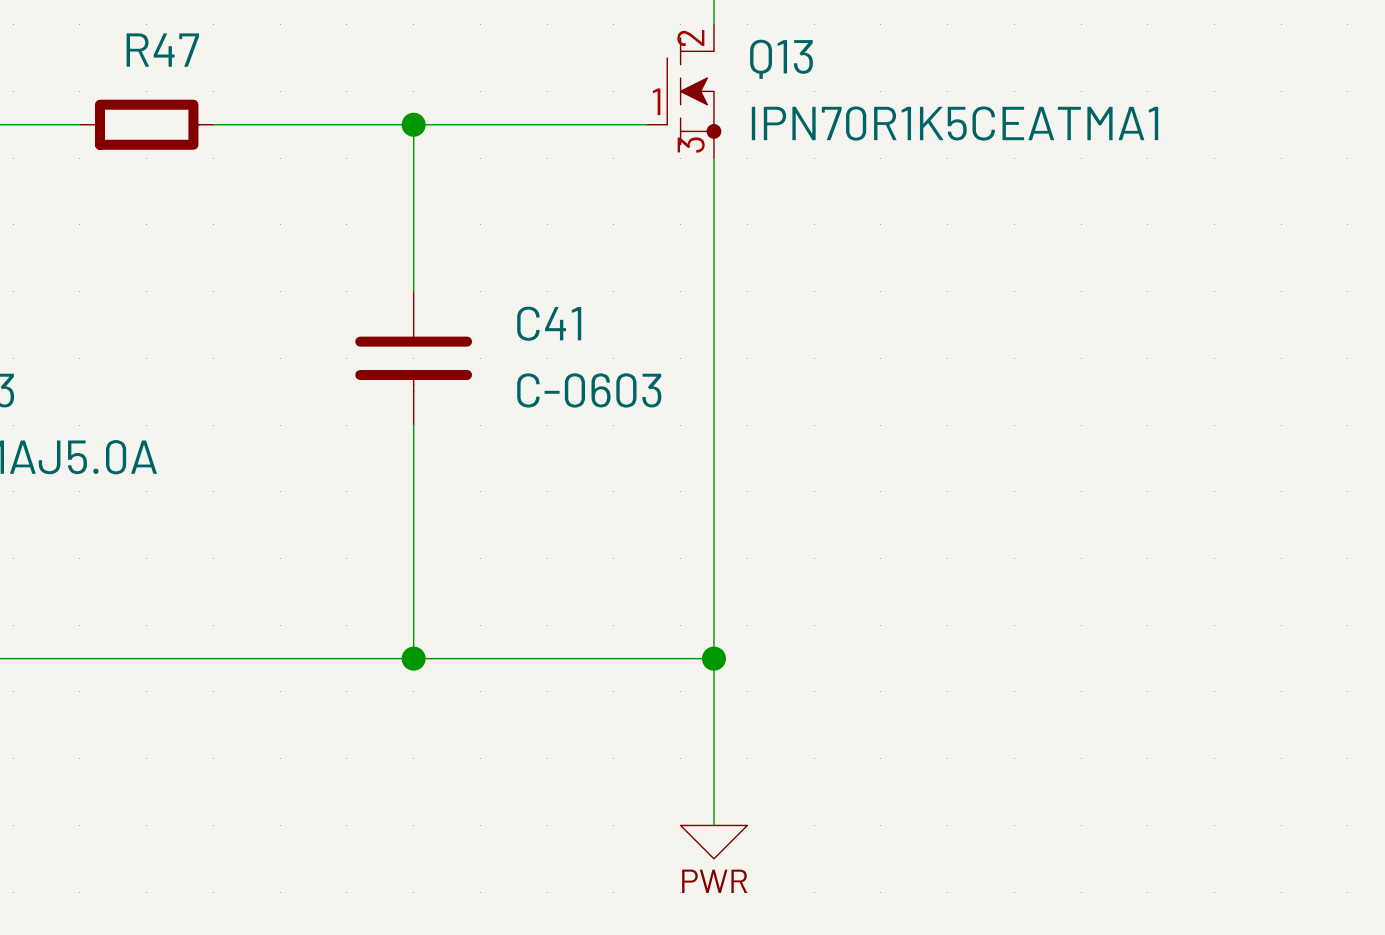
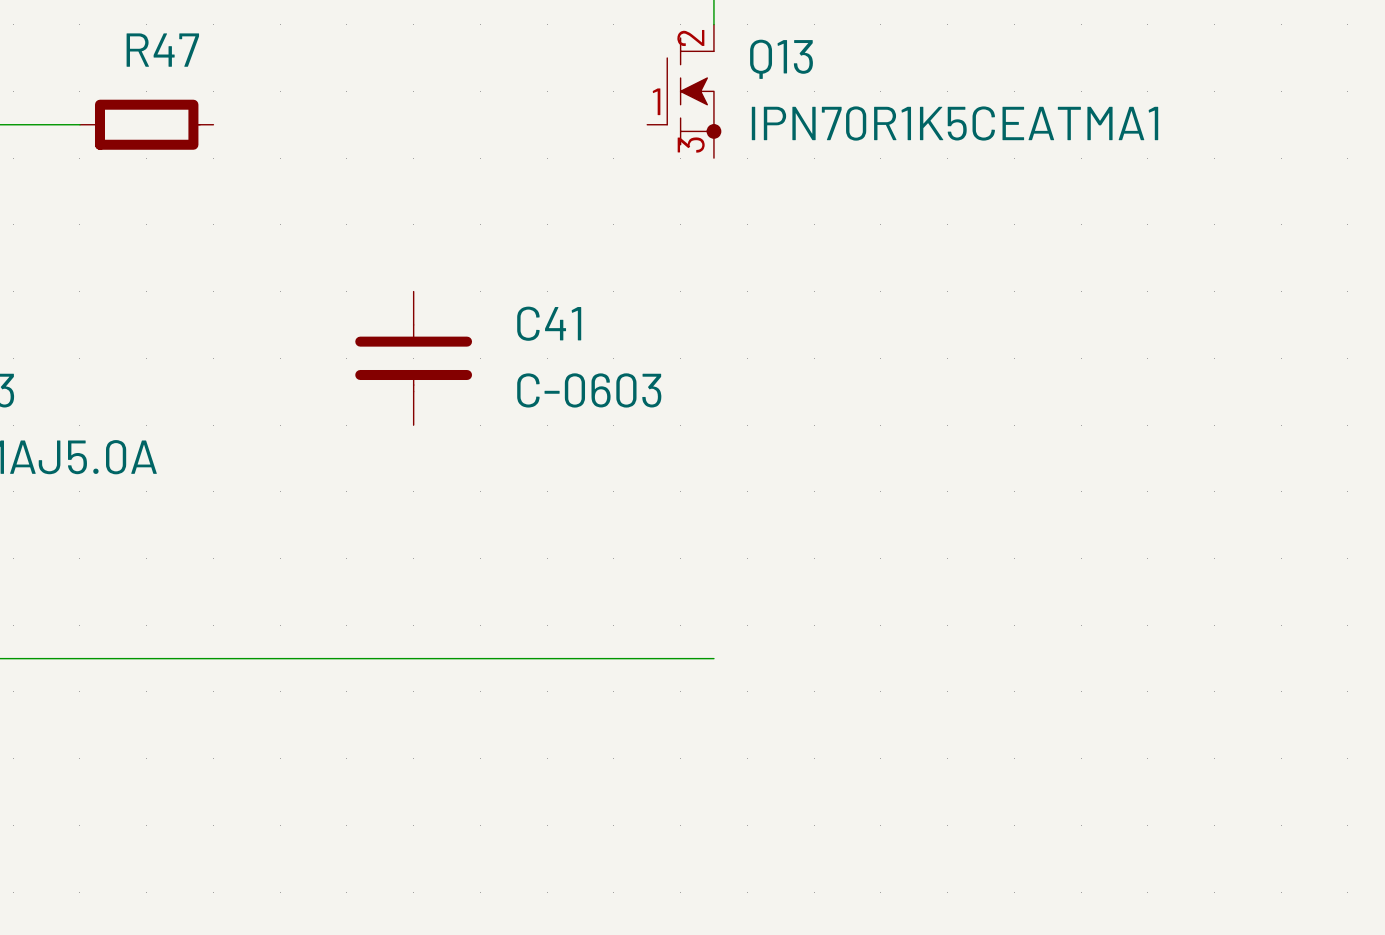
wire: (213, 124) (647, 124) -> none
wire: (413, 124) (413, 291) -> none
junction: (413, 124) -> none
wire: (713, 158) (713, 825) -> none
wire: (413, 425) (413, 658) -> none
junction: (413, 658) -> none
junction: (713, 658) -> none
power symbol: (713, 842) -> none

